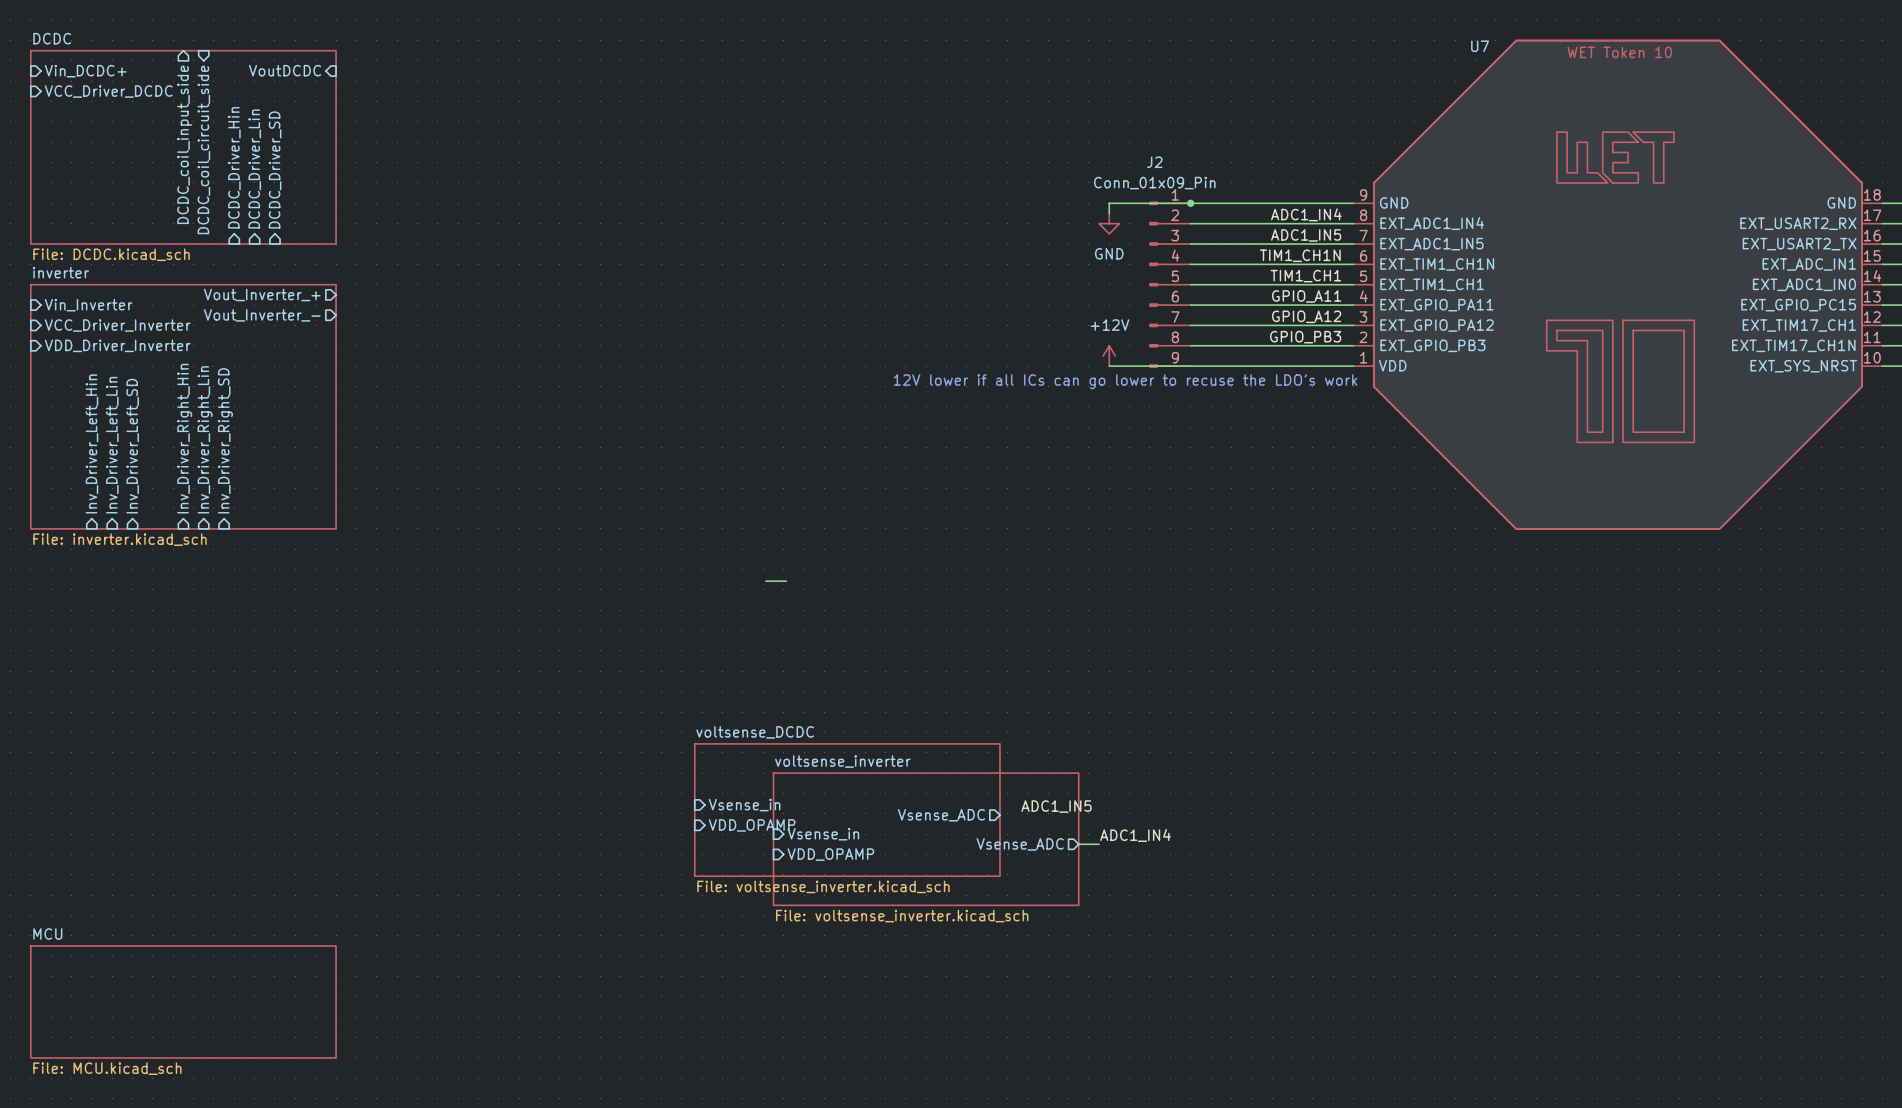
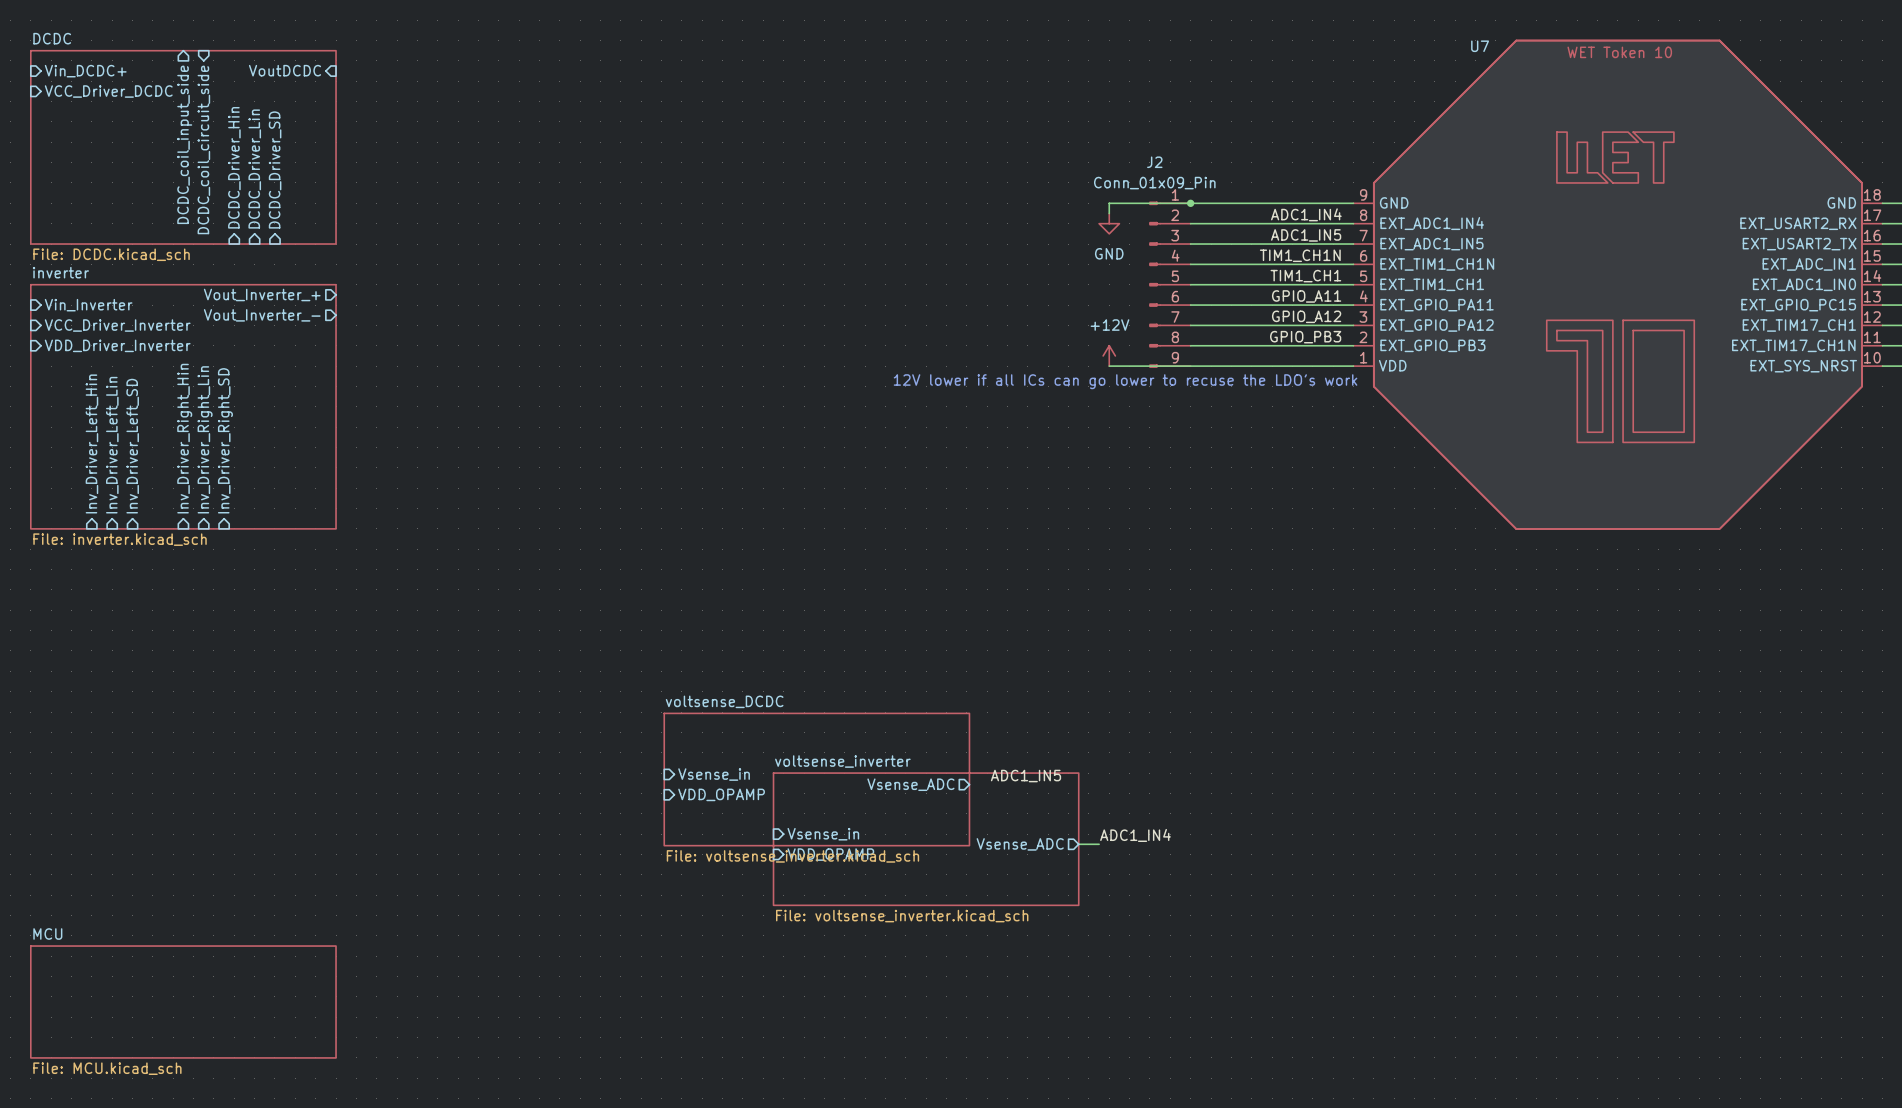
wire: (765, 581) (786, 581) -> none
sheet pin position: Vsense_in (744, 805) -> Vsense_in (714, 774)
label position: ADC1_IN5 (1056, 806) -> ADC1_IN5 (1025, 776)
sheet voltsense_DCDC position: (847, 810) -> (816, 779)
sheet pin position: Vsense_ADC (941, 815) -> Vsense_ADC (910, 784)
sheet pin position: VDD_OPAMP (752, 825) -> VDD_OPAMP (721, 794)

